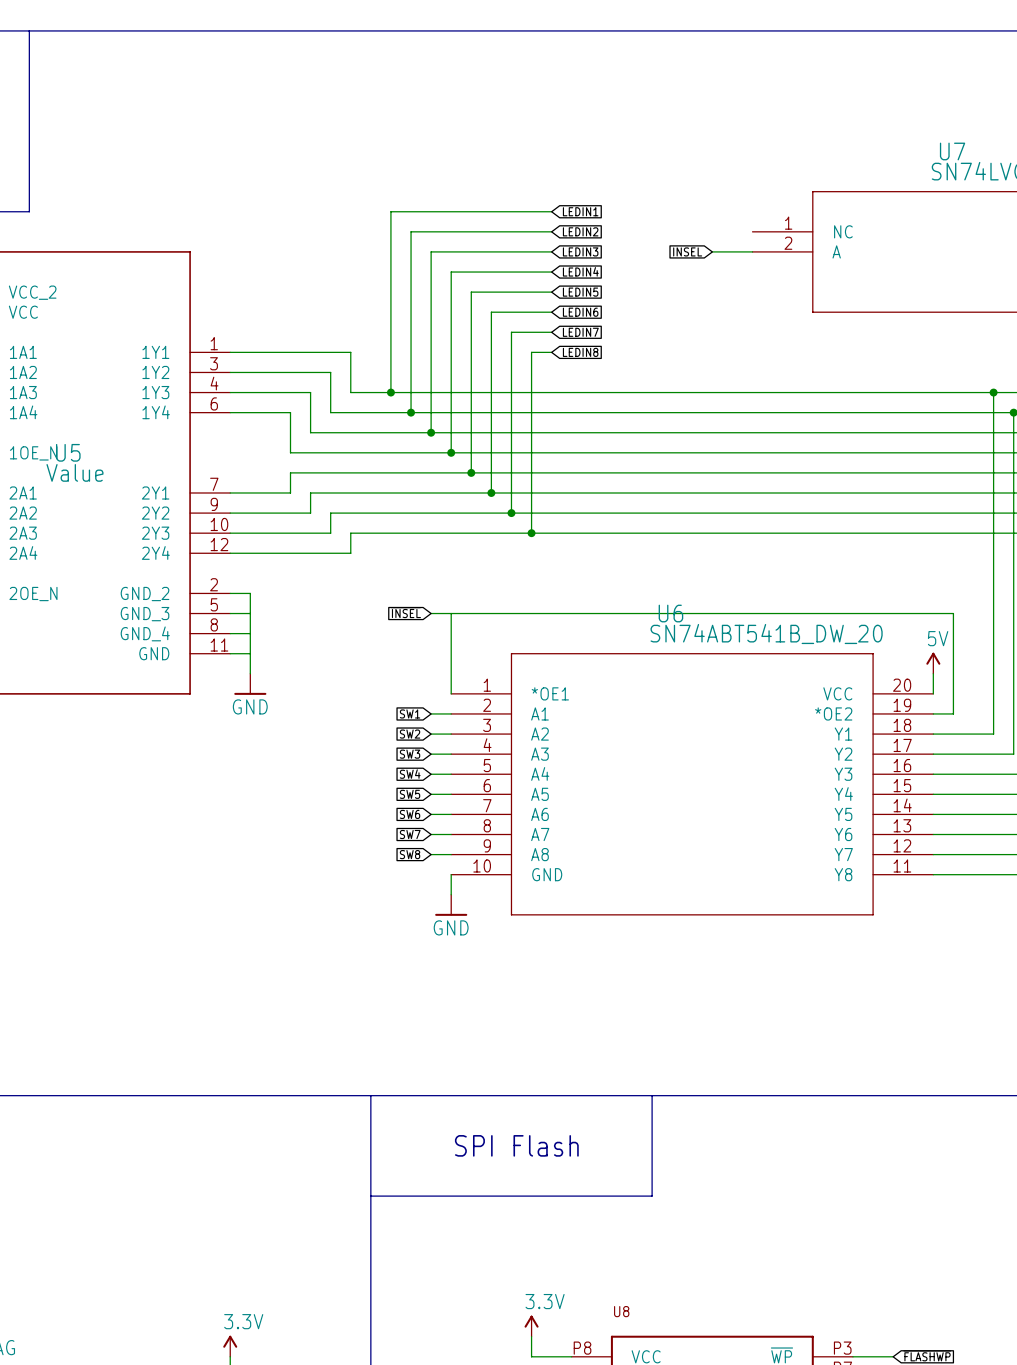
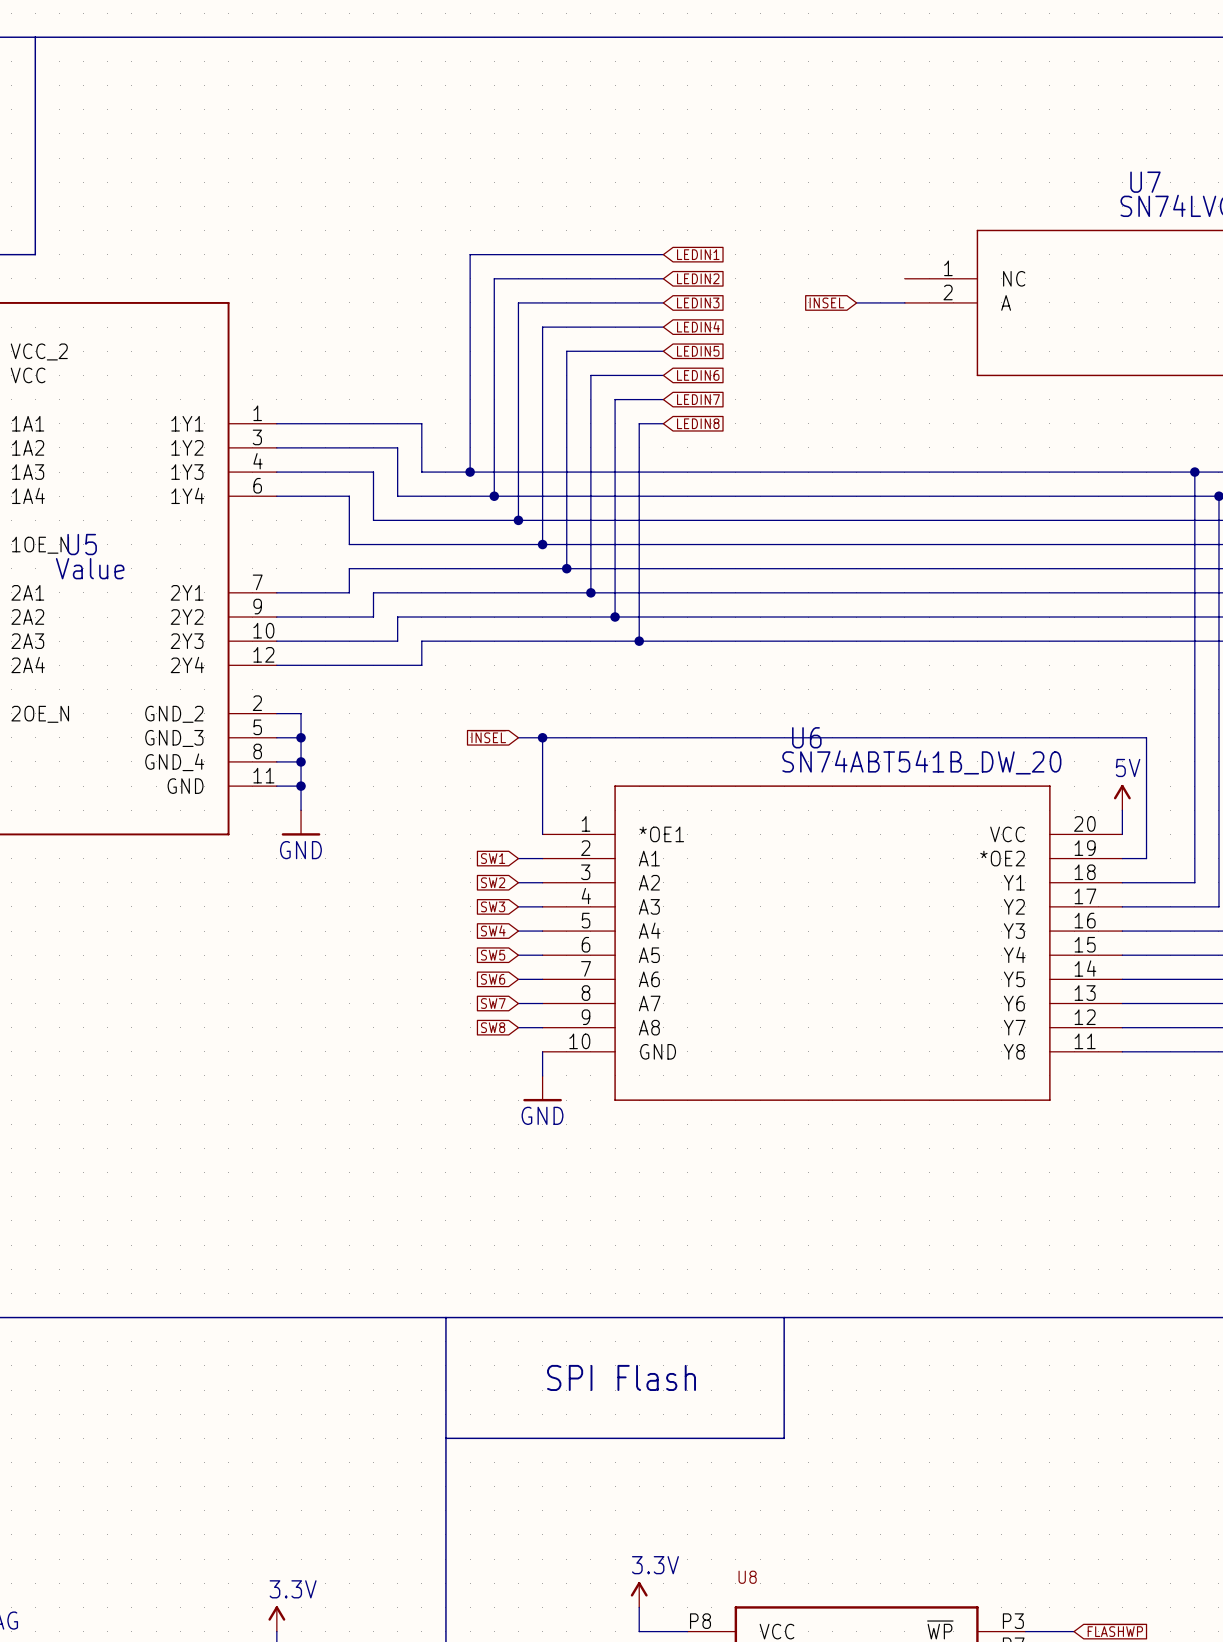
junction: none -> (301, 737)
junction: none -> (542, 737)
junction: none -> (301, 761)
junction: none -> (301, 786)

